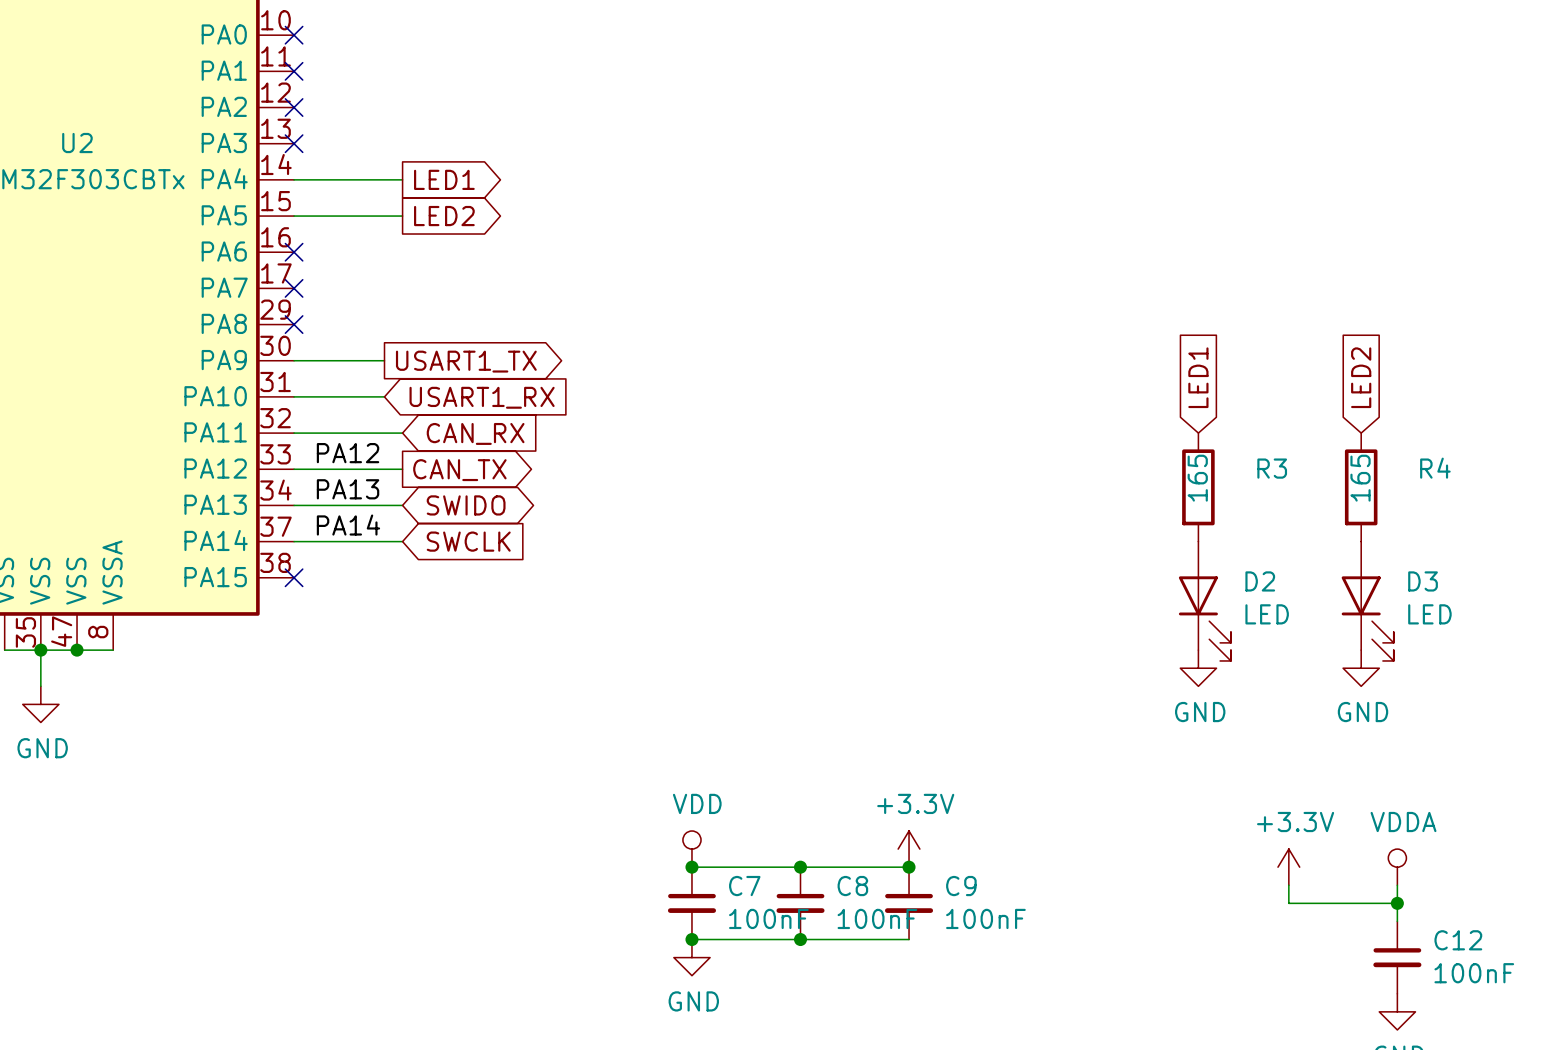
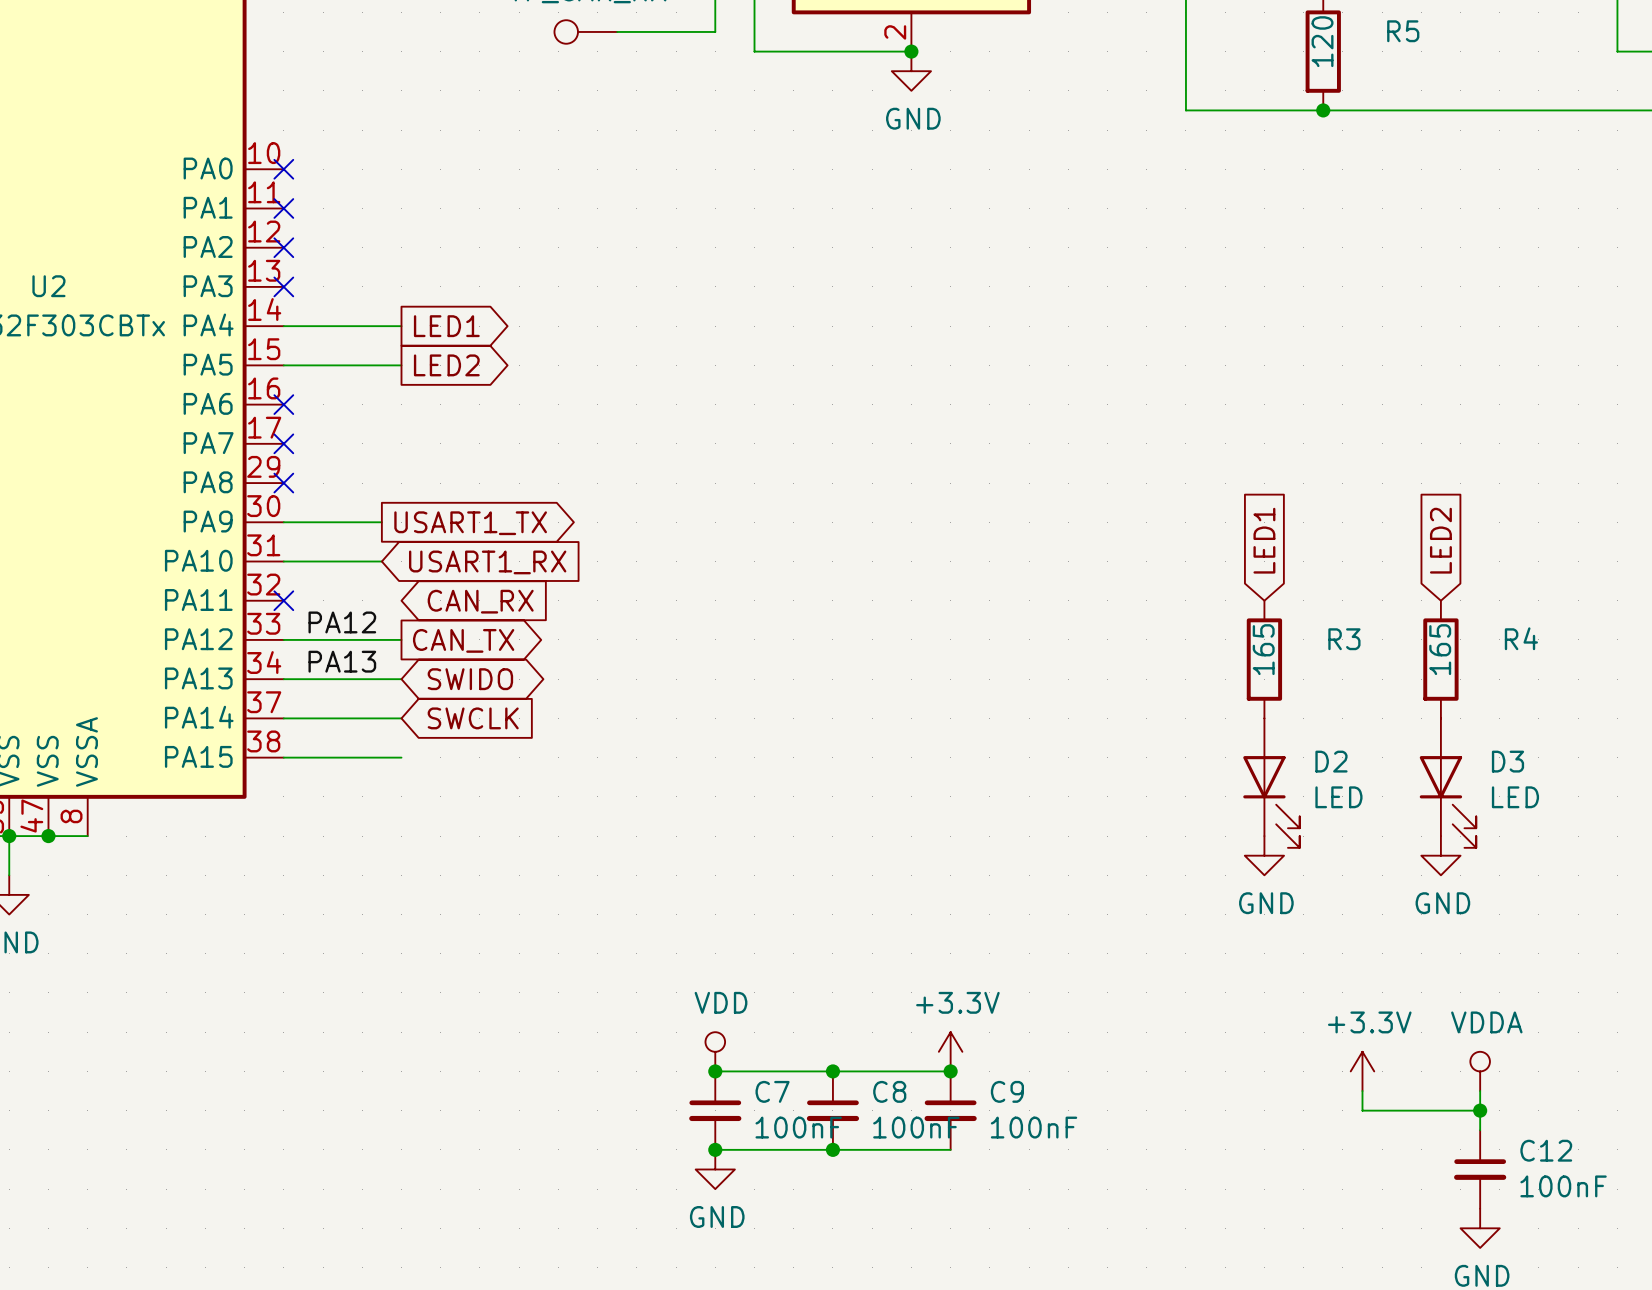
wire: (294, 433) (402, 433) -> (283, 757) (401, 757)
no-connect mark: none -> (283, 600)
label: PA14 (348, 525) -> none
no-connect mark: (294, 577) -> none

